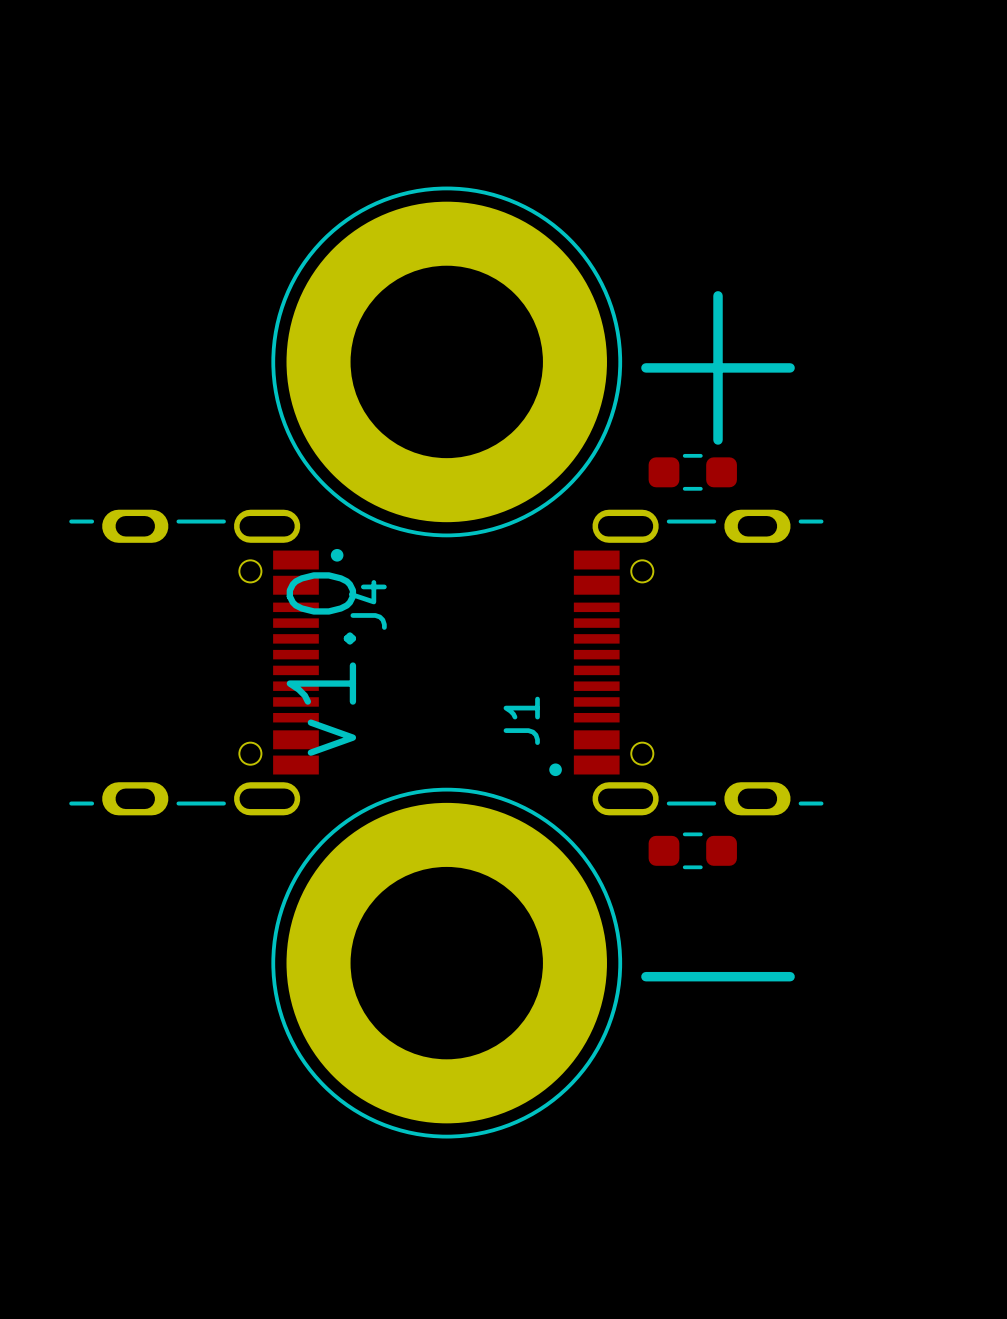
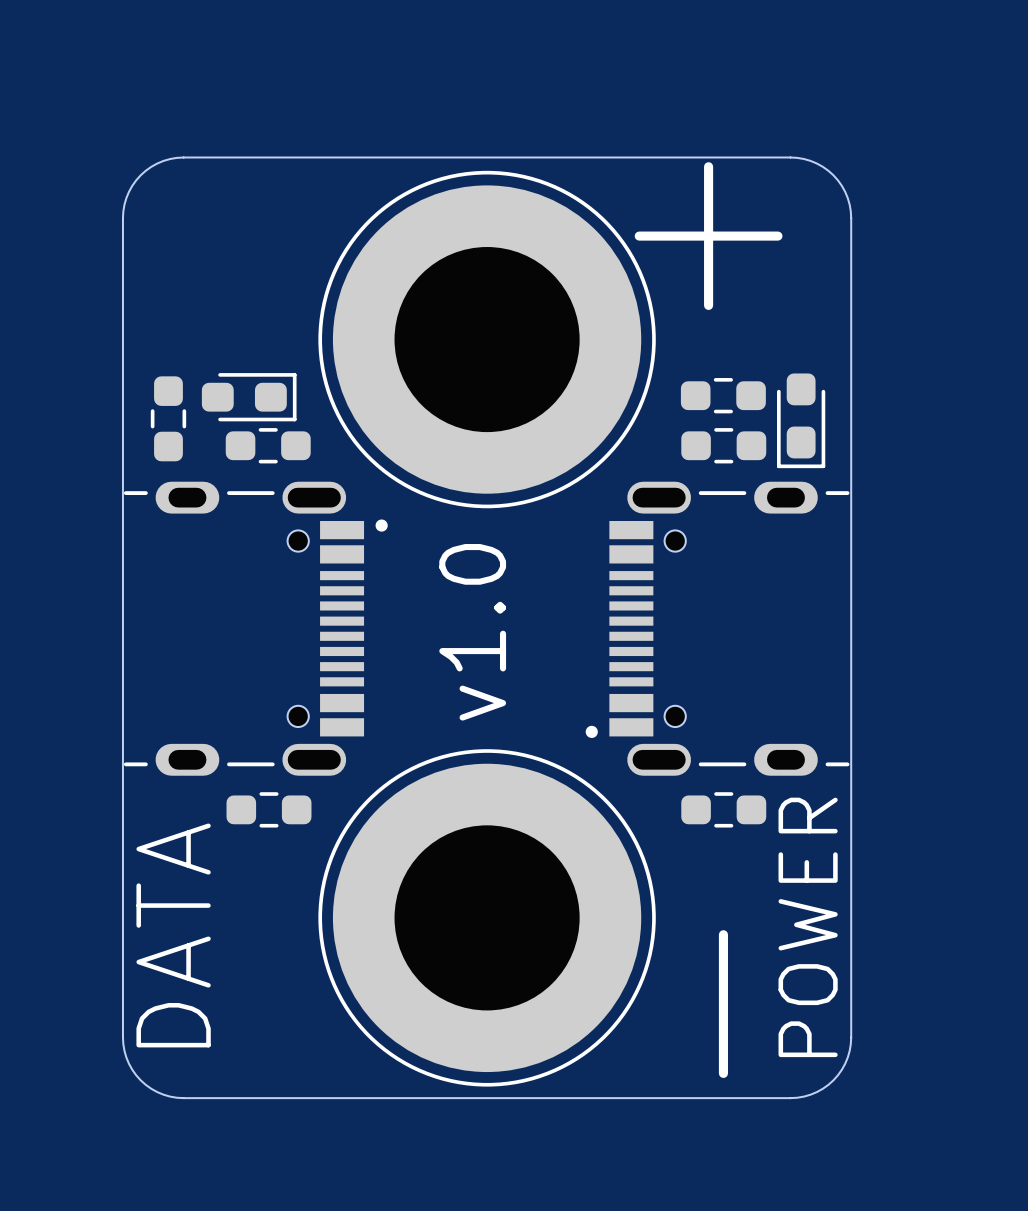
board edge: none -> (183, 157) (790, 157) (804, 159) (816, 163) (828, 170) (841, 185) (847, 198) (851, 218) (851, 1037) (849, 1050) (845, 1063) (837, 1075) (822, 1088) (804, 1096) (790, 1098) (183, 1098) (170, 1096) (157, 1092) (145, 1084) (132, 1069) (124, 1050) (122, 1037) (123, 211) (128, 191) (140, 175) (157, 163) (170, 159) (183, 157)
text position: + (718, 367) -> + (708, 236)
part: none -> (723, 395)
part: none -> (249, 397)
part: none -> (168, 418)
part: none -> (801, 420)
part: none -> (268, 445)
J4 name: J4 (367, 604) -> none
text position: v1.0 (321, 664) -> v1.0 (472, 632)
J1 name: J1 (521, 720) -> none
part: none -> (268, 809)
text: none -> POWER (808, 927)
text rotation: 0° (718, 976) -> 90° counterclockwise (723, 1004)
text: none -> DATA (173, 935)

